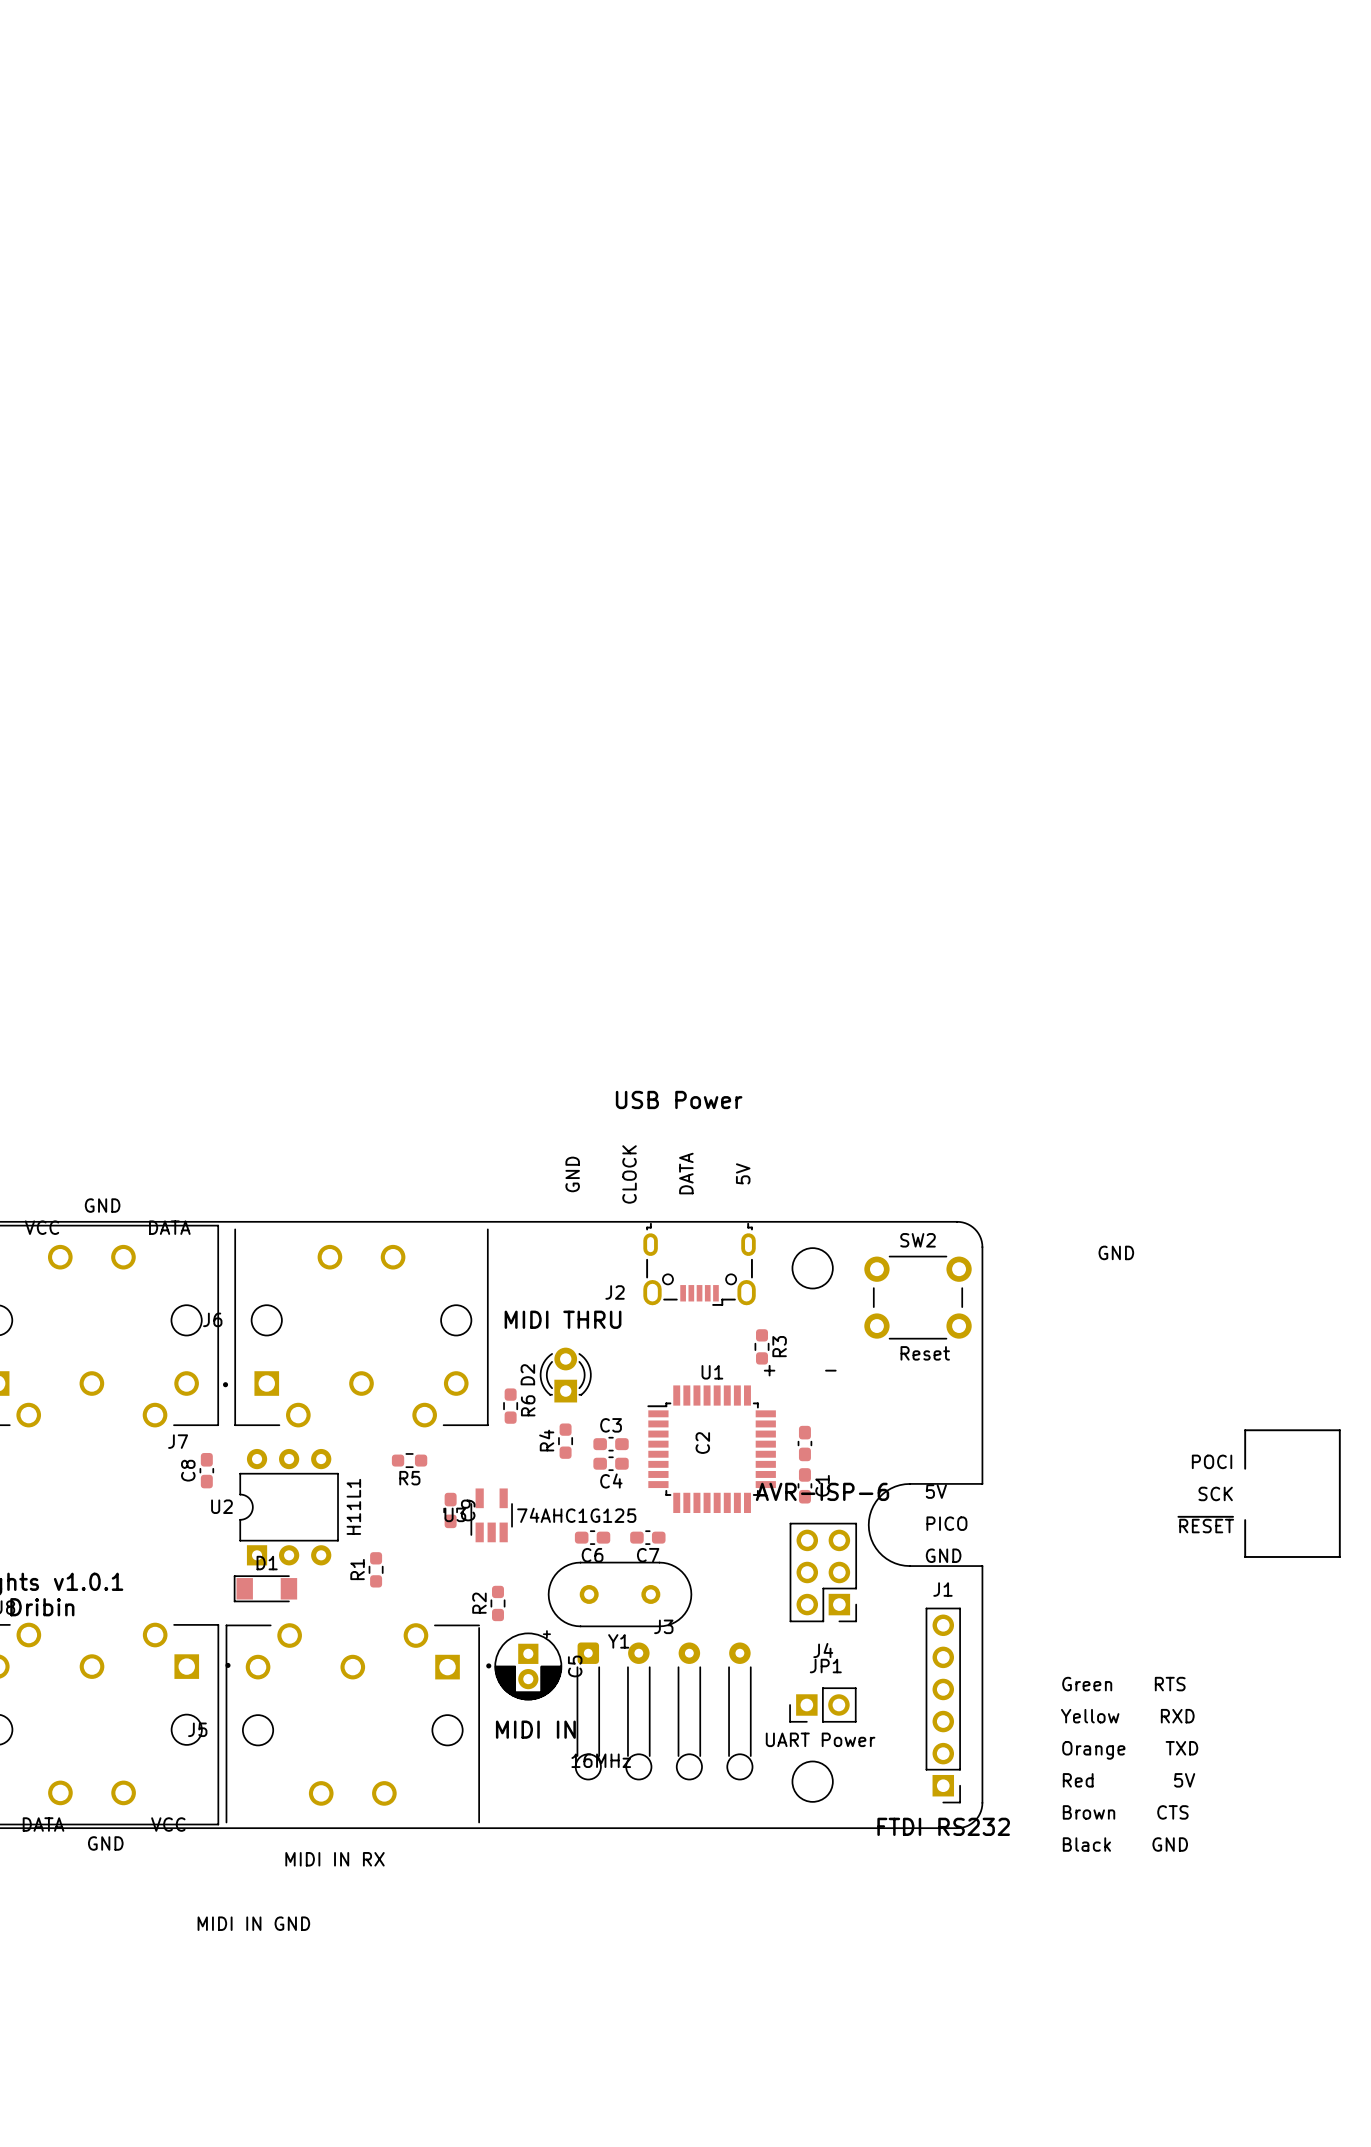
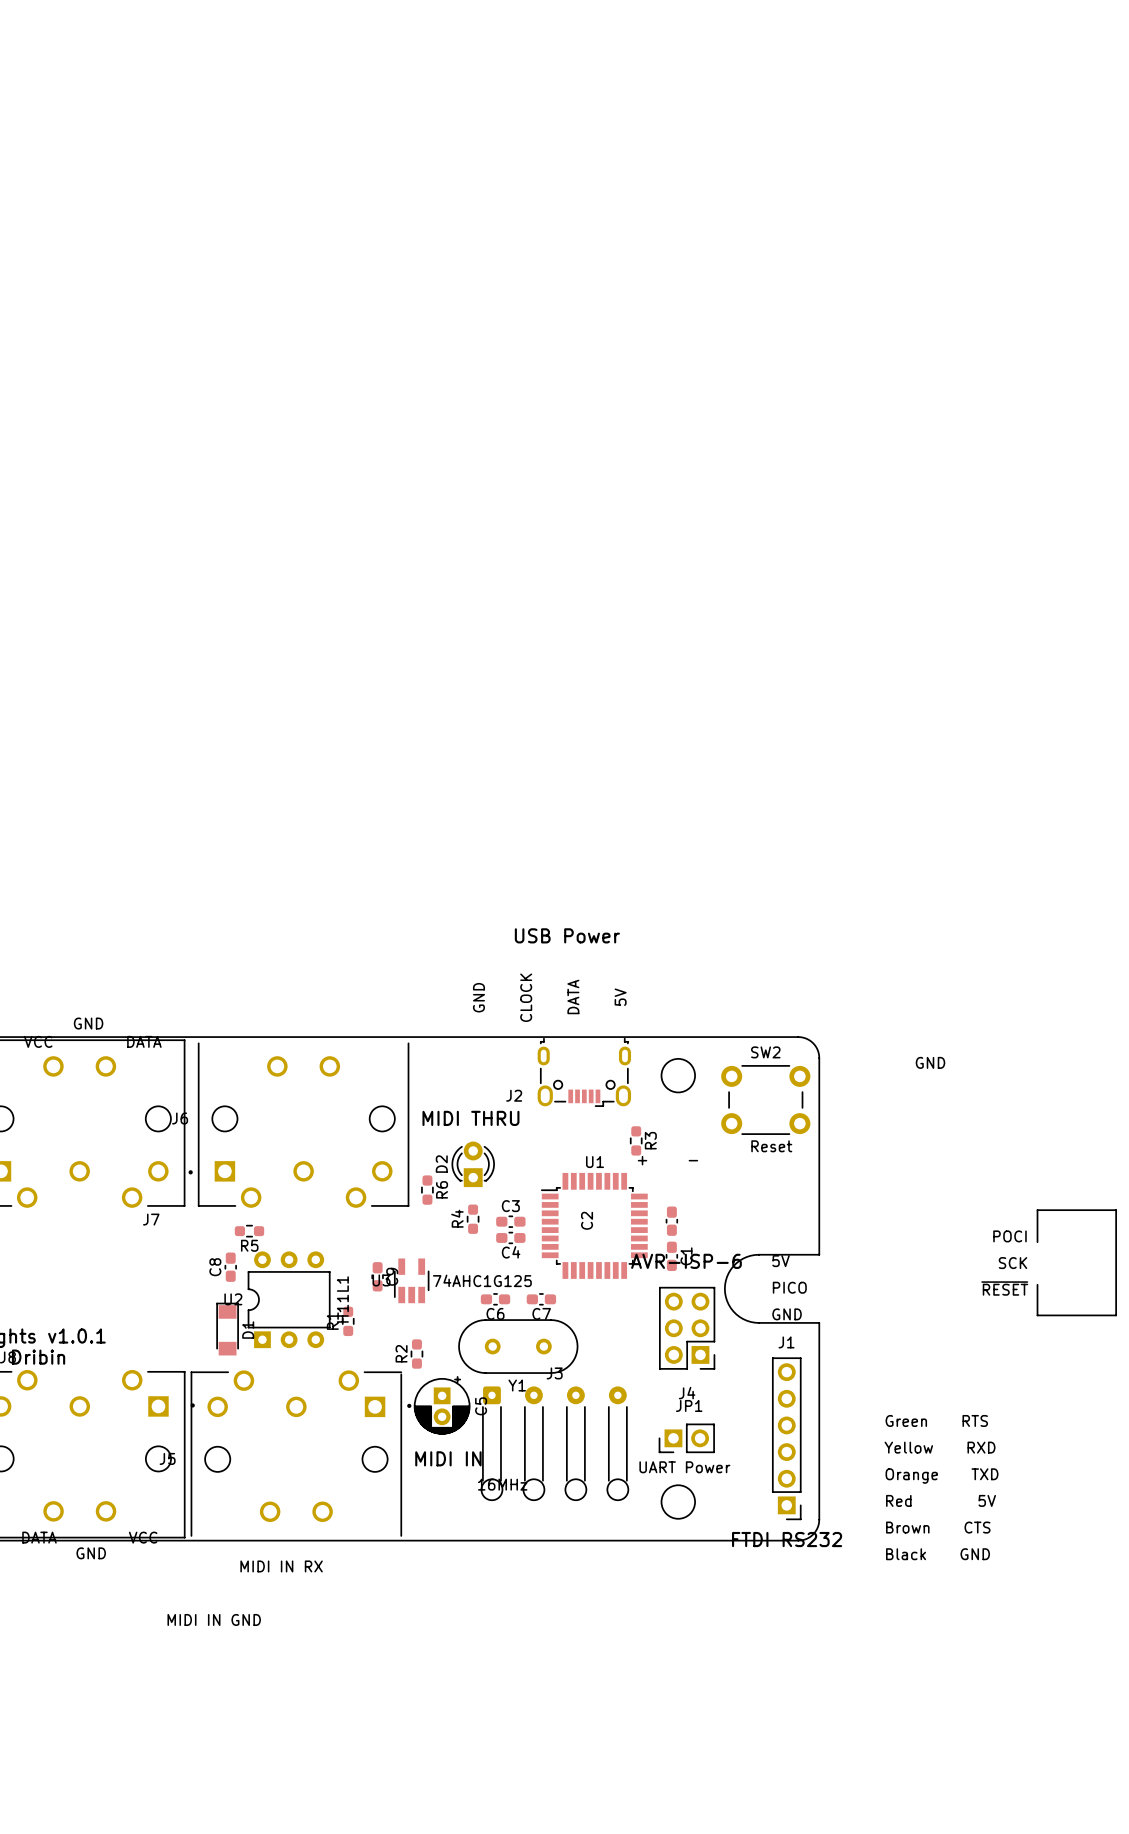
R5 position: (409, 1460) -> (249, 1231)
C8 position: (206, 1470) -> (230, 1267)
U2 position: (289, 1507) -> (289, 1299)
R1 position: (376, 1569) -> (348, 1321)
D1 rotation: 0° (265, 1588) -> 90° clockwise (227, 1329)

